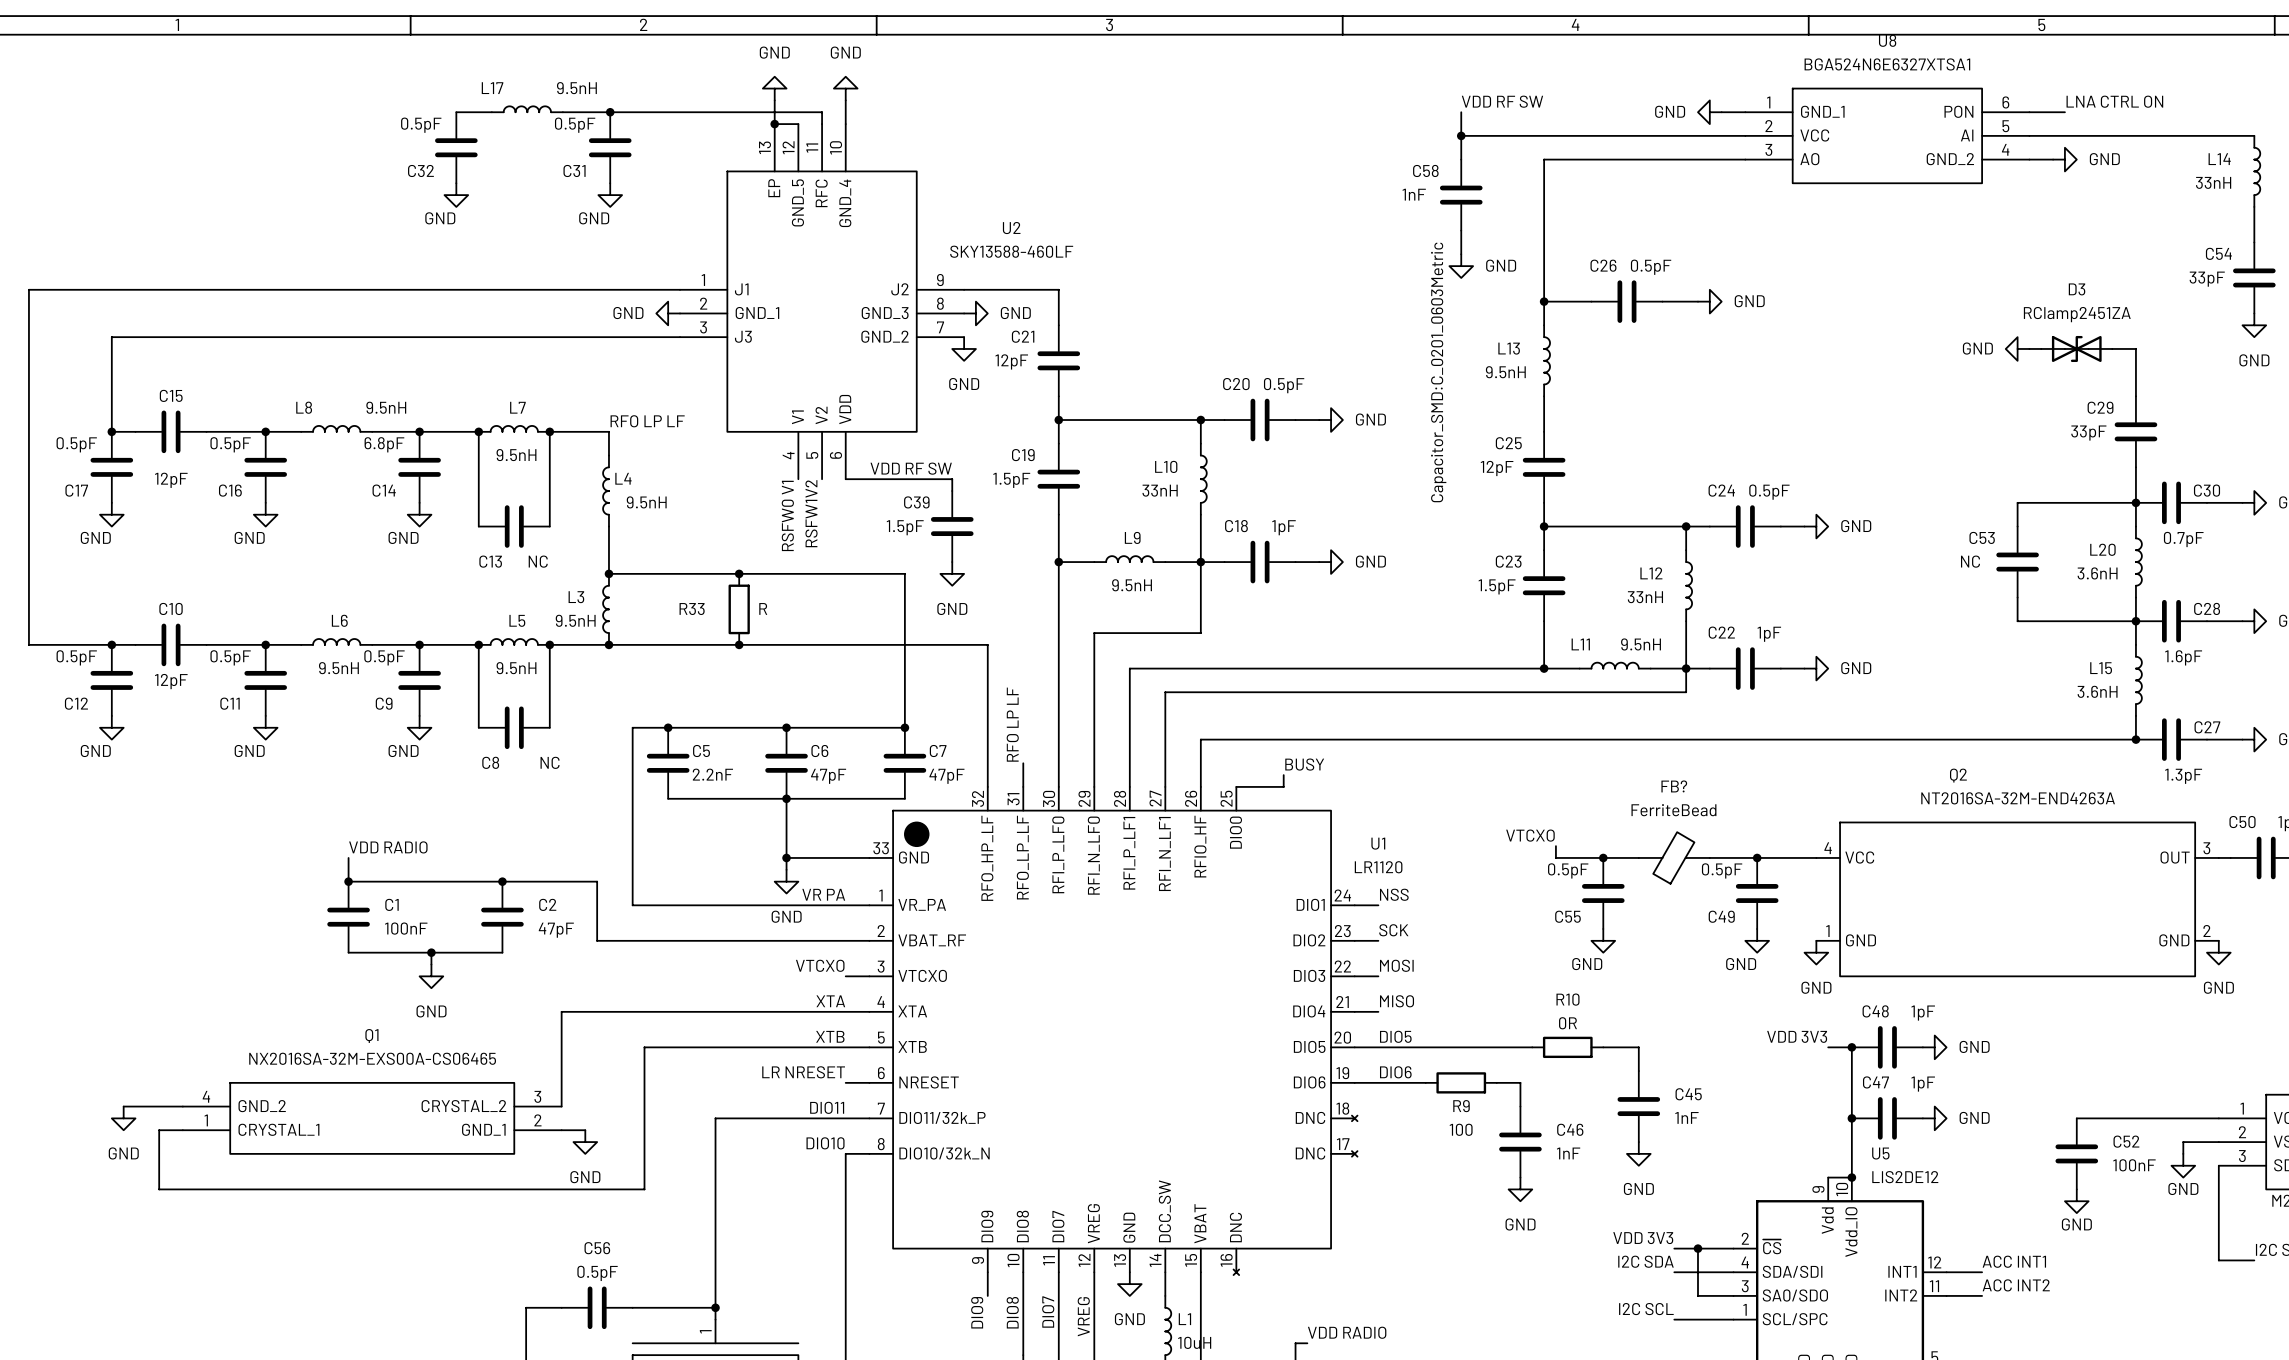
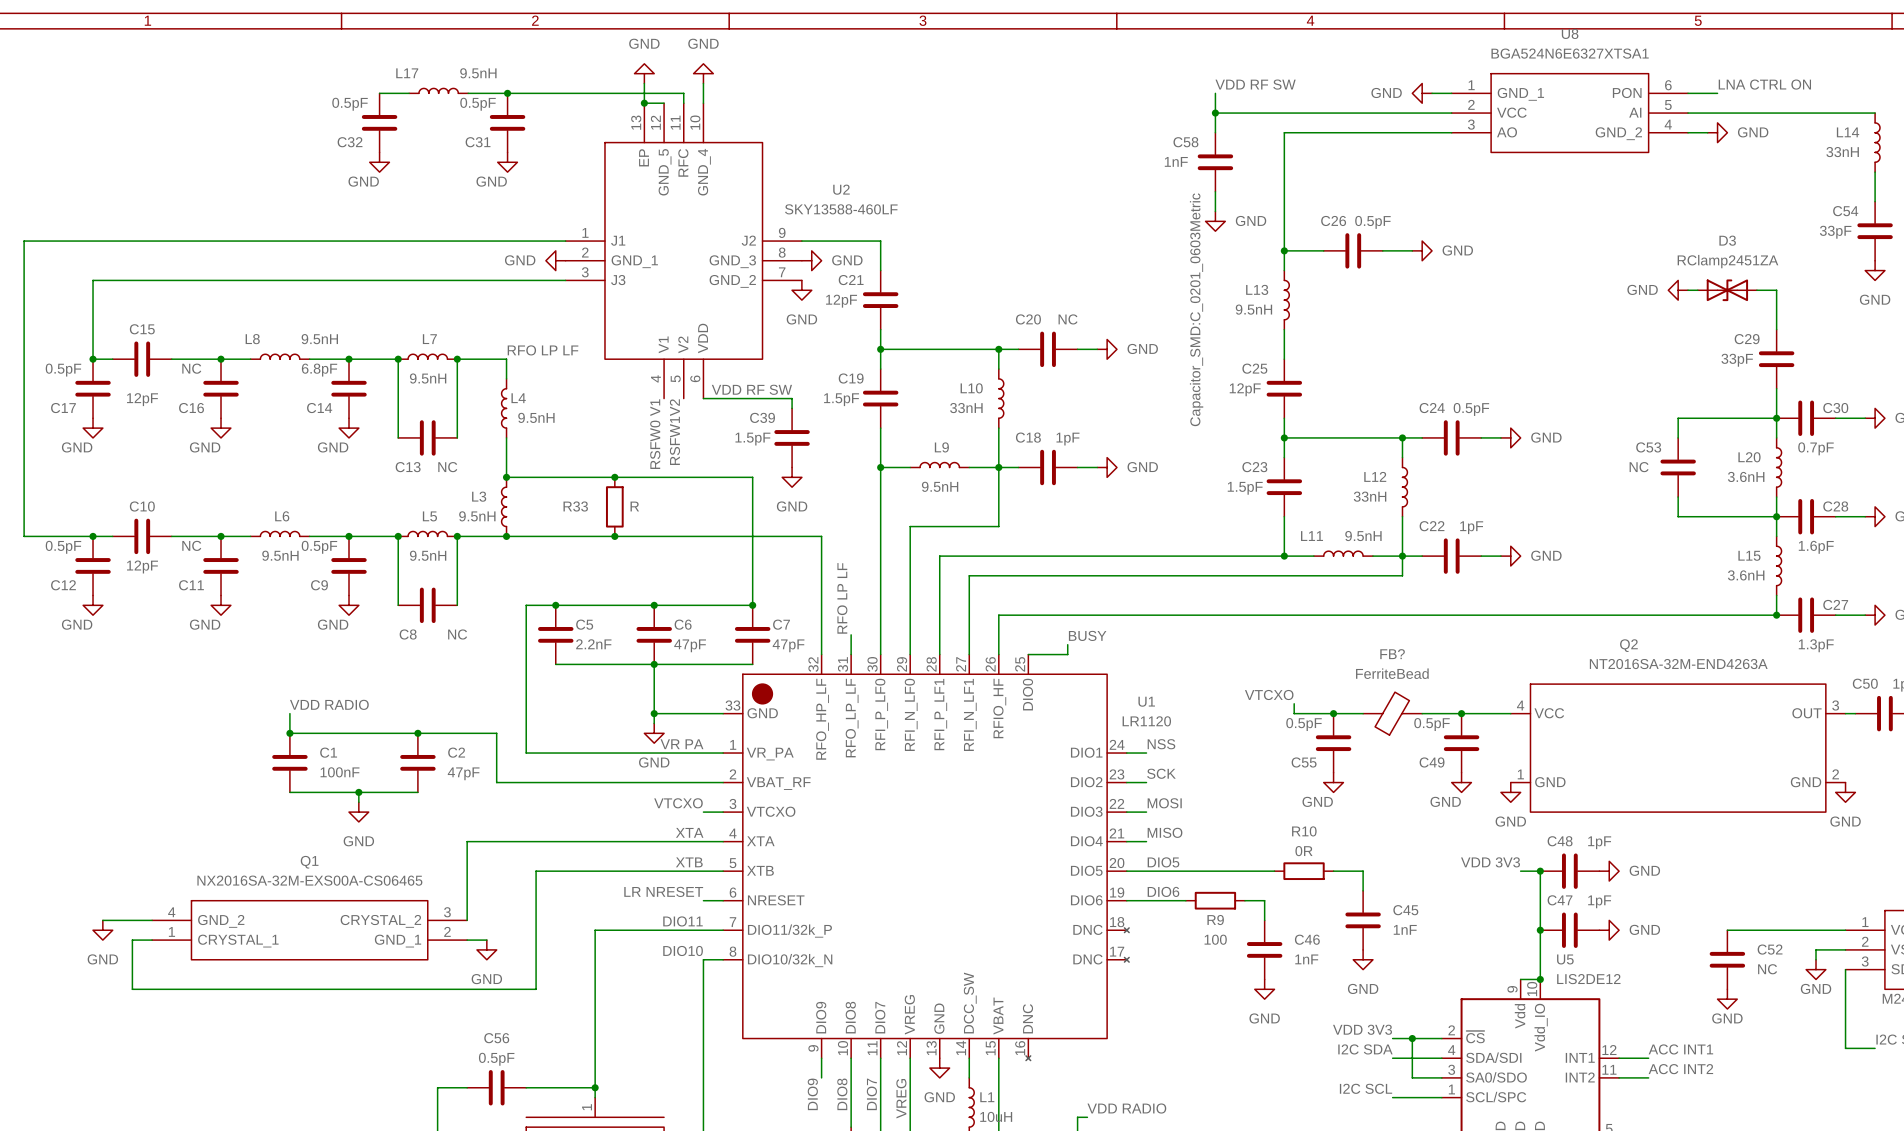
C20 value: 0.5pF (1284, 385) -> NC (1068, 319)
C16 value: 0.5pF (230, 444) -> NC (191, 368)
C11 value: 0.5pF (230, 657) -> NC (191, 545)
C52 value: 100nF (2134, 1165) -> NC (1767, 969)

